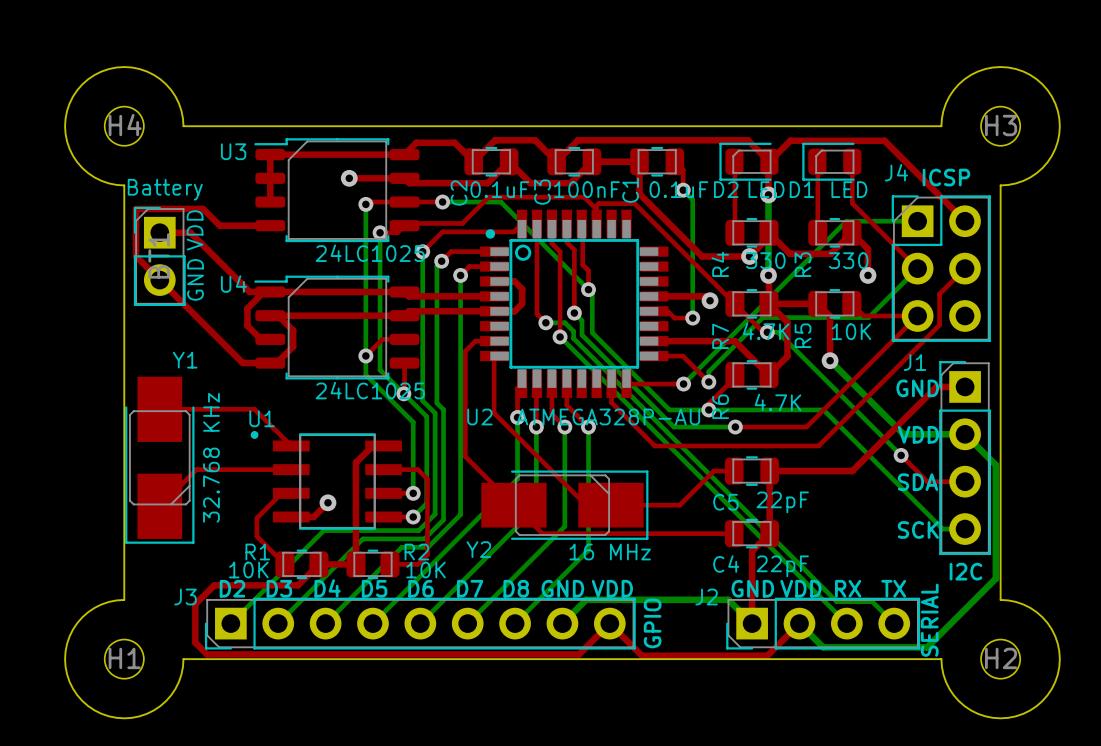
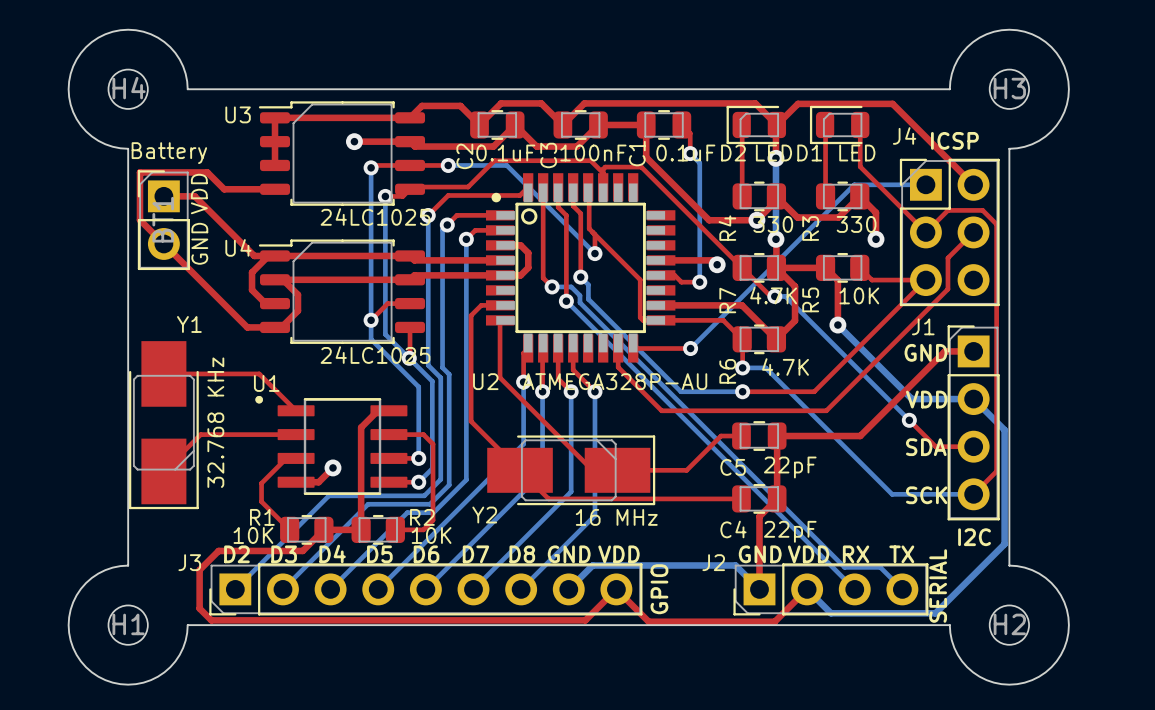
top track: none -> (925, 232) (947, 210) (982, 210) (996, 224) (996, 471) (973, 494)
bottom track: (917, 268) (868, 317) (762, 317) (708, 371) (708, 382) -> none
top track: none -> (594, 234) (640, 279) (640, 317) (643, 320) (661, 320)
bottom track: (588, 289) (592, 293) (592, 332) (669, 409) (823, 409) (942, 529) -> (742, 367) (765, 367) (892, 494) (951, 494)
top track: (682, 356) (708, 382) -> (689, 320) (723, 320) (742, 339) (742, 367)
top track: (734, 374) (734, 377) (708, 403) (708, 409) -> none
via: (708, 382) -> none
via: none -> (742, 367)
via: (708, 409) -> none

